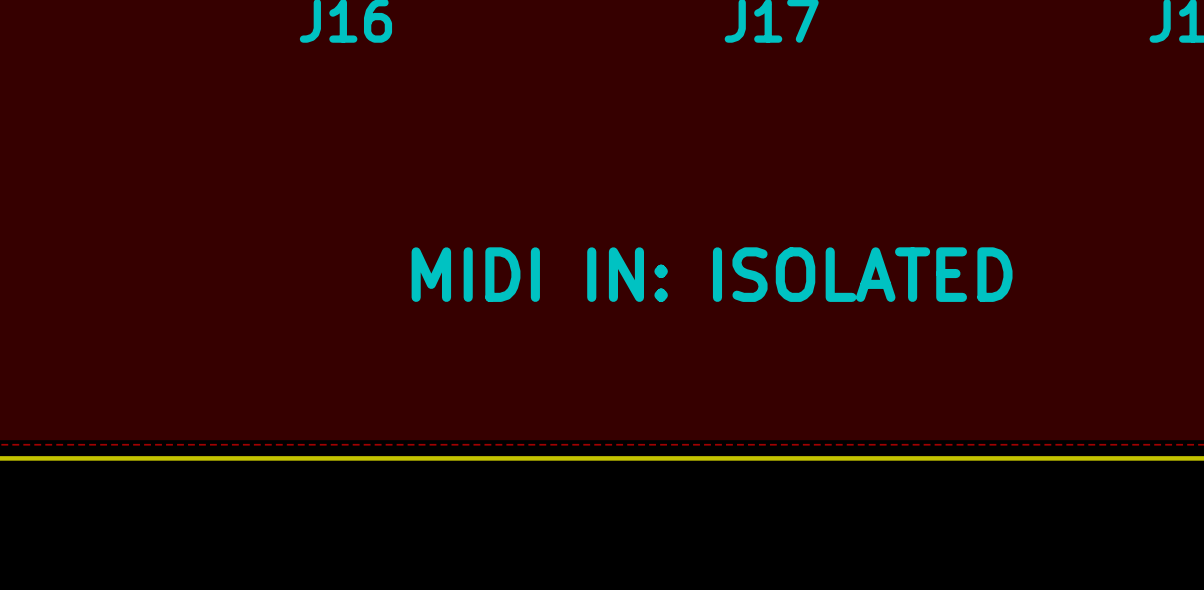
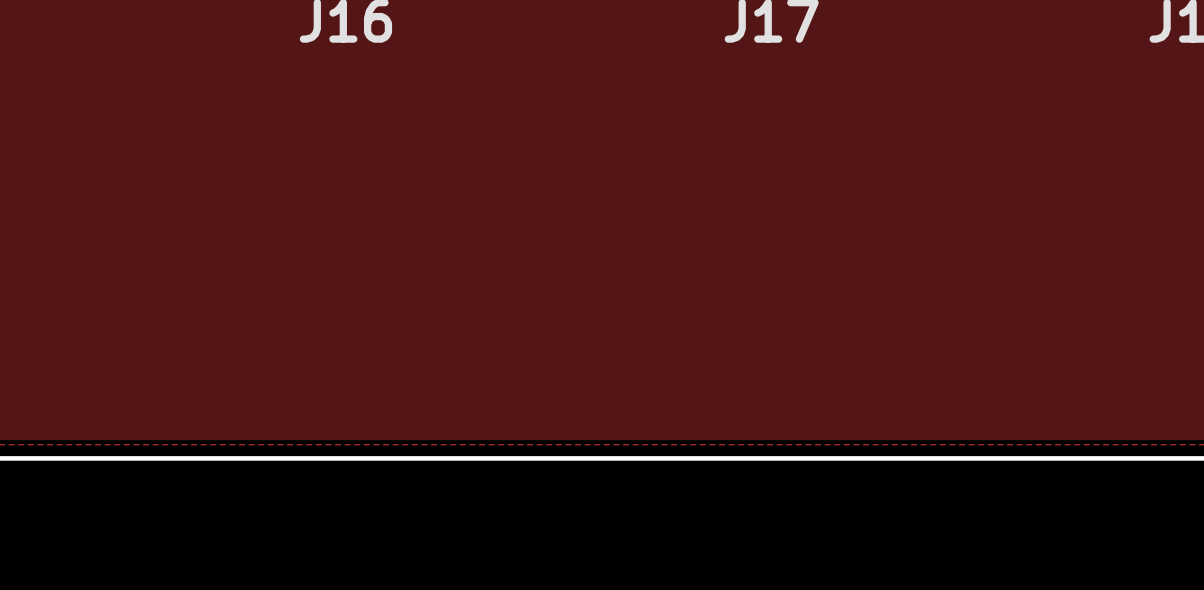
text: MIDI IN: ISOLATED (712, 274) -> none

